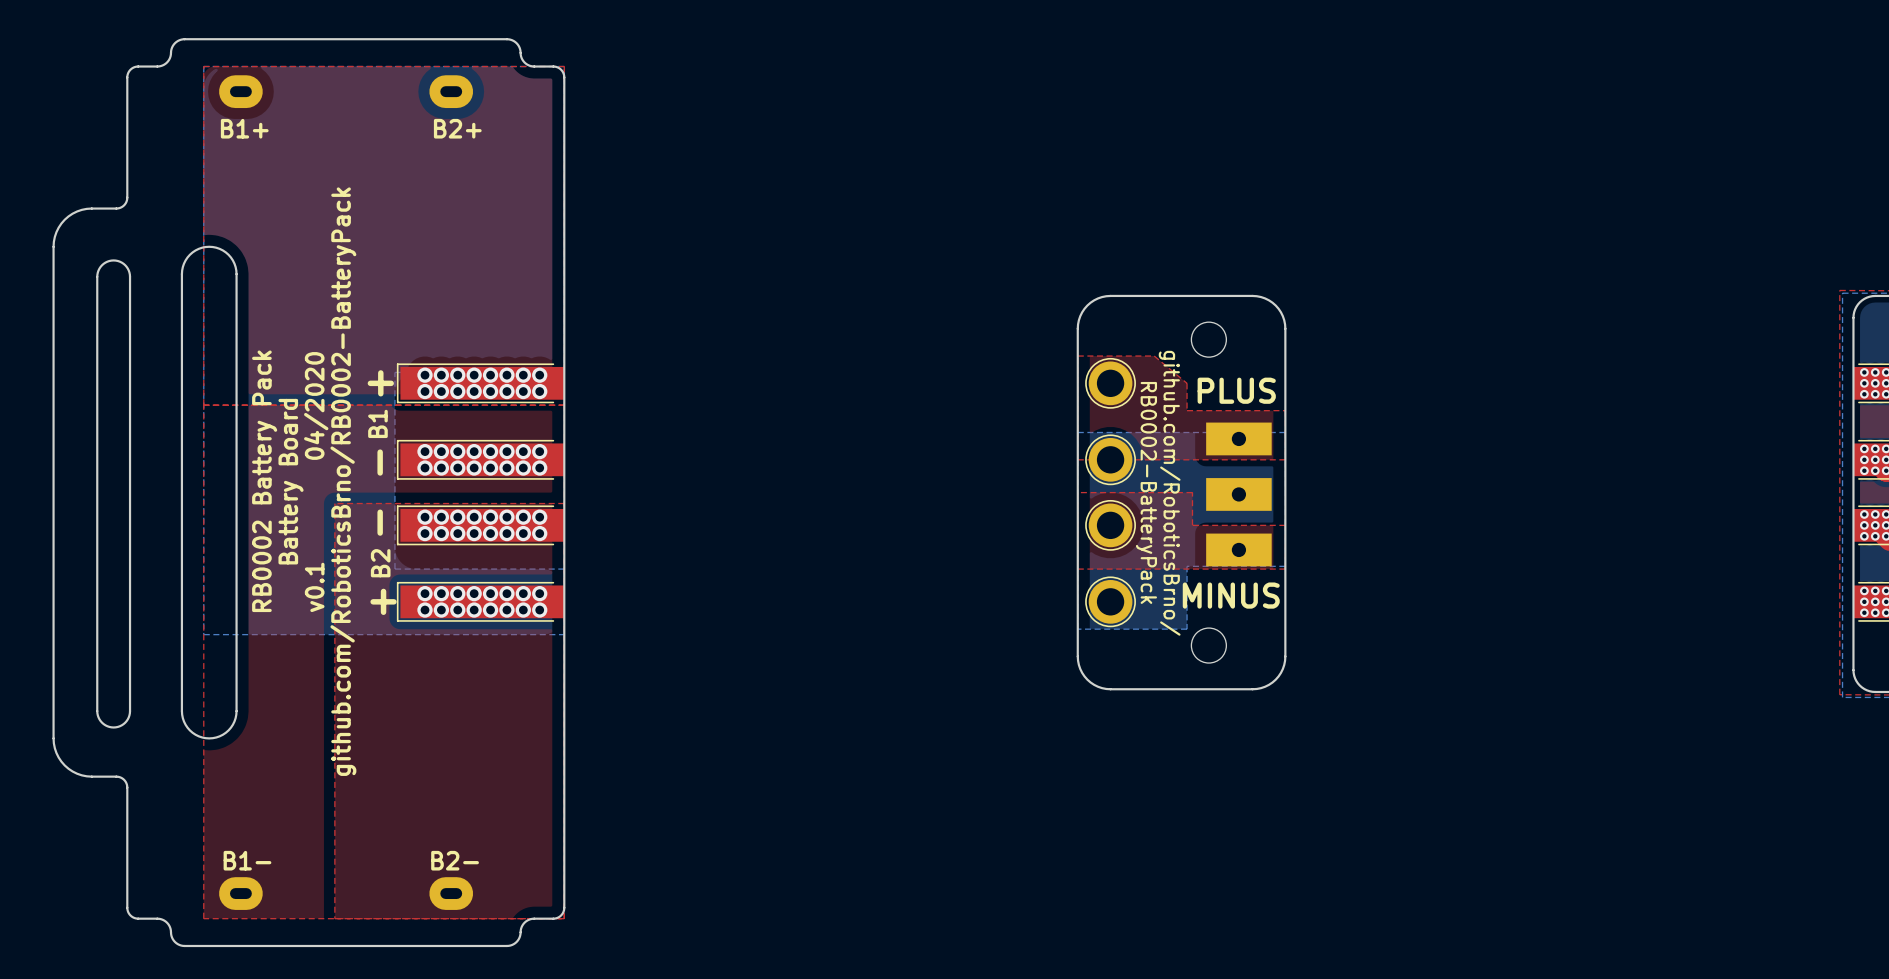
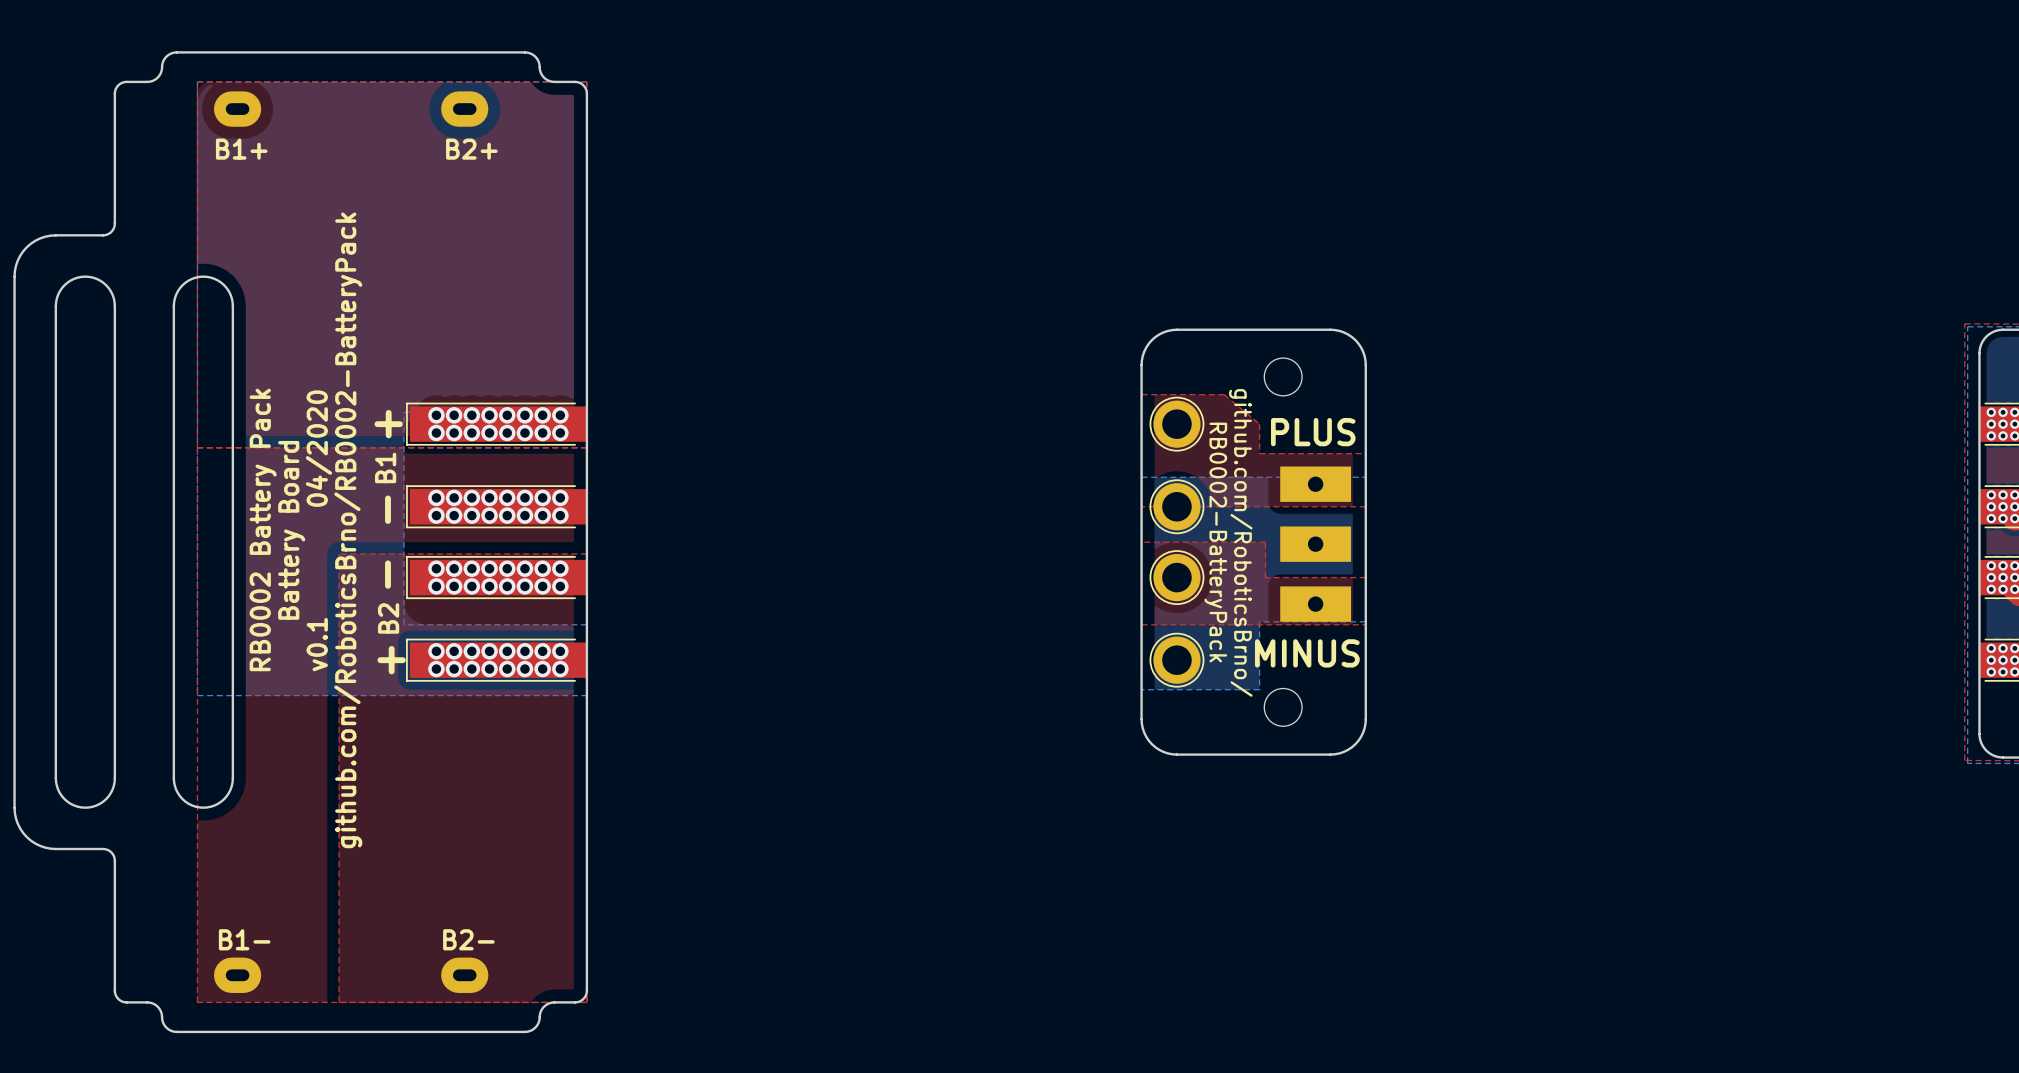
board edge: (91, 208) (77, 211) (64, 219) (56, 232) (53, 246) (53, 743) (56, 753) (64, 765) (77, 773) (91, 776) -> (76, 235) (50, 235) (35, 240) (20, 255) (14, 276) (14, 813) (20, 828) (35, 843) (50, 848) (76, 849)
board edge: (97, 276) (97, 711) (102, 722) (113, 727) (125, 722) (130, 711) (130, 276) (125, 265) (113, 260) (102, 265) (97, 276) -> (55, 306) (55, 778) (58, 789) (64, 799) (74, 805) (85, 807) (96, 805) (106, 799) (112, 789) (114, 778) (114, 306) (112, 294) (106, 285) (96, 278) (85, 276) (74, 278) (64, 285) (58, 294) (55, 306)

